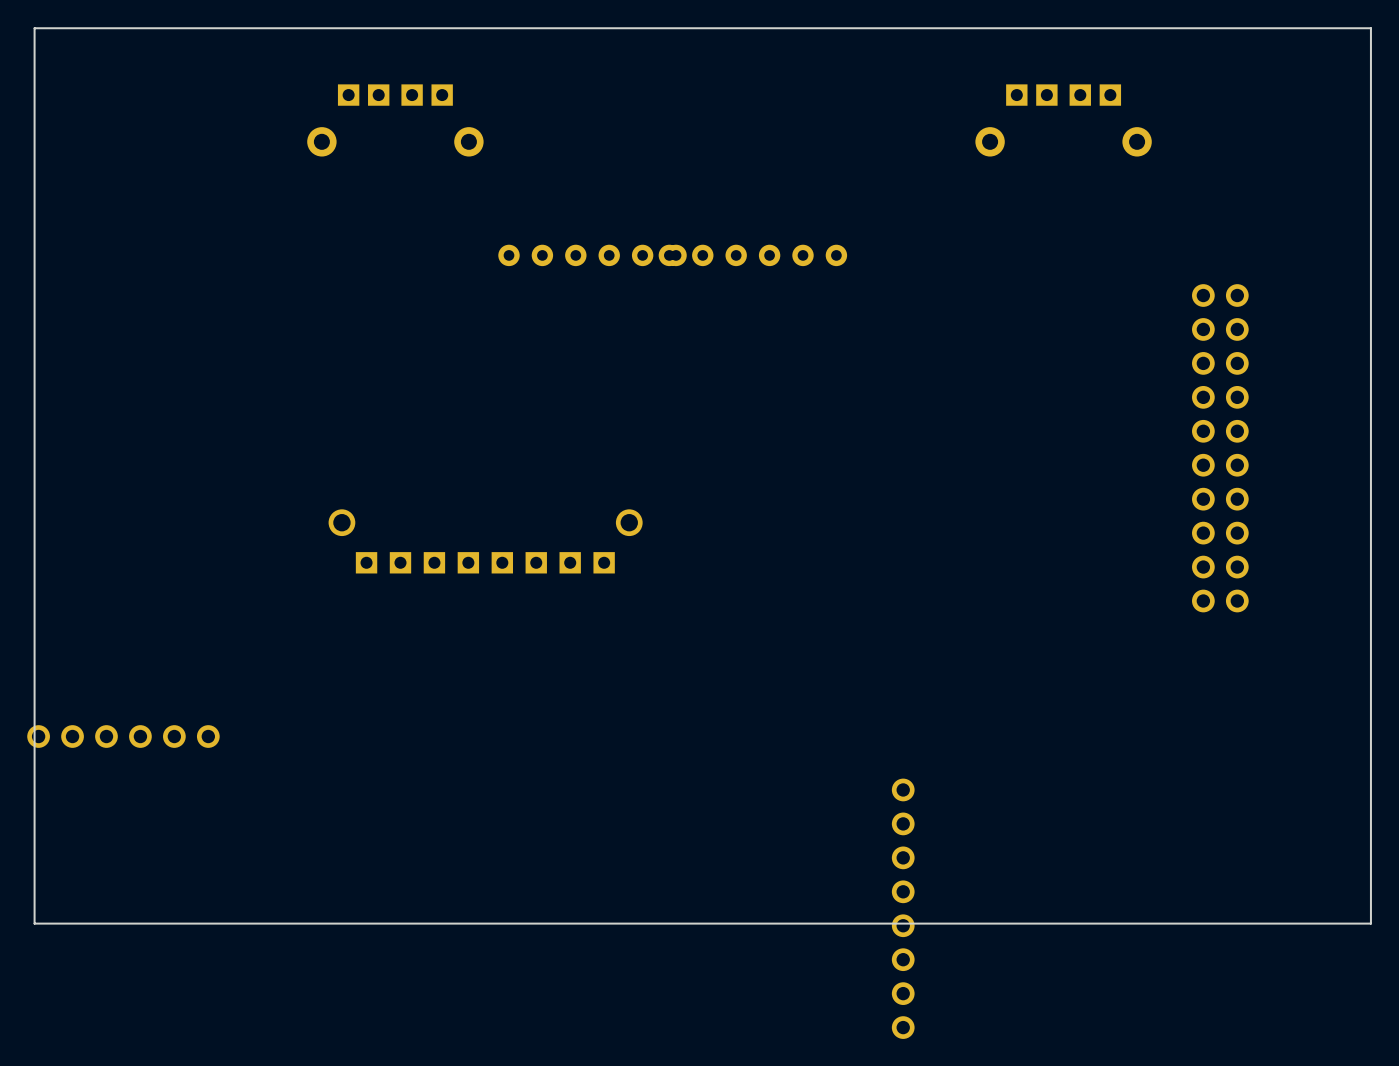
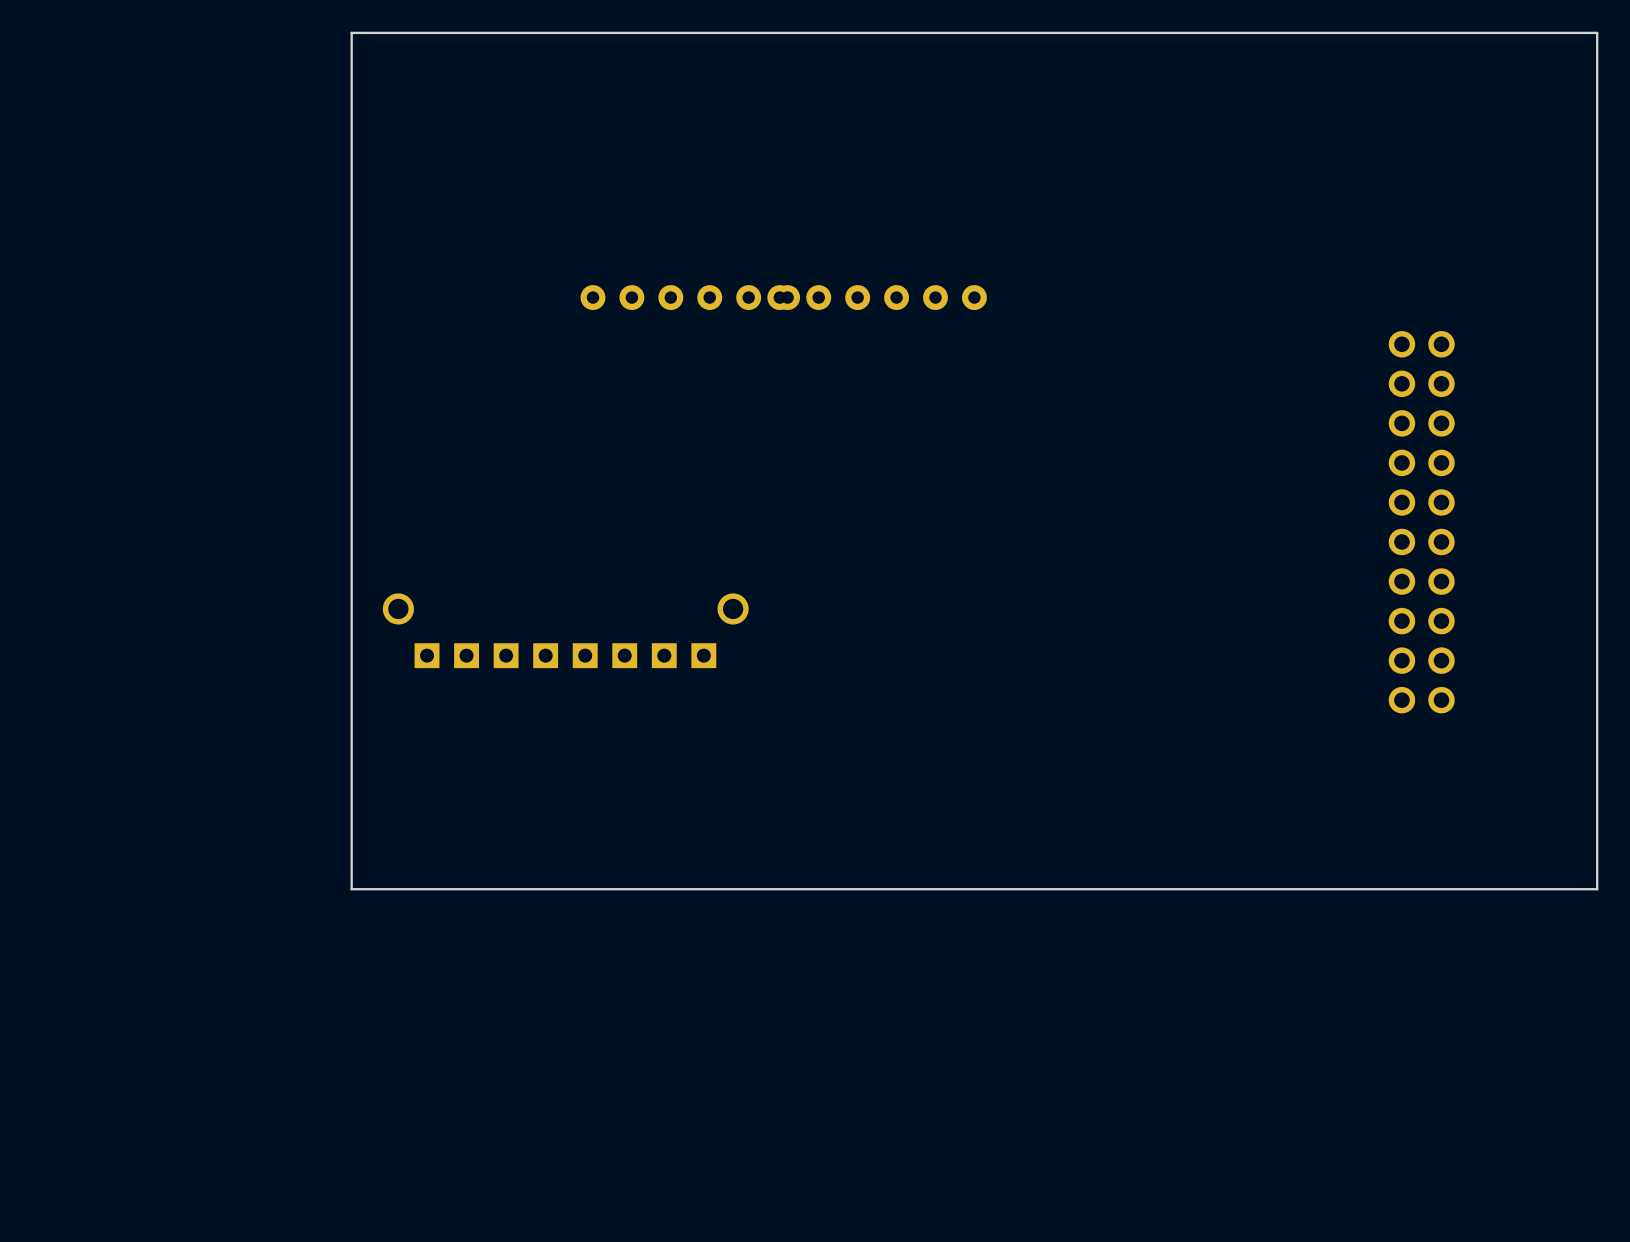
board edge: (301, 28) (34, 28) (34, 923) (1370, 923) (1370, 763) -> (351, 32) (351, 889) (1597, 889)
part: (395, 120) -> none
part: (1063, 120) -> none
part: (123, 736) -> none
part: (903, 908) -> none

